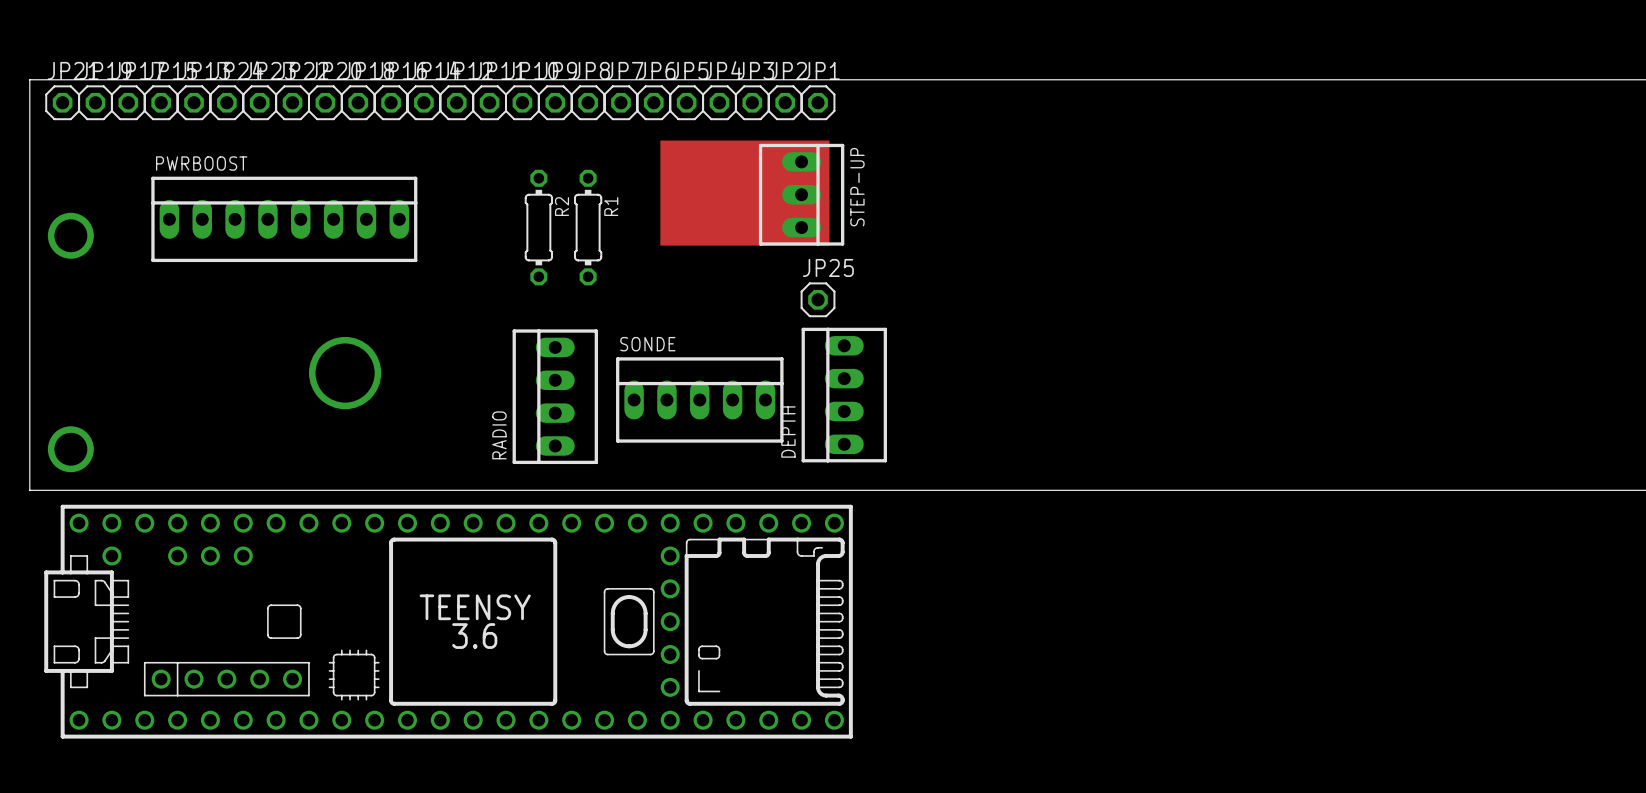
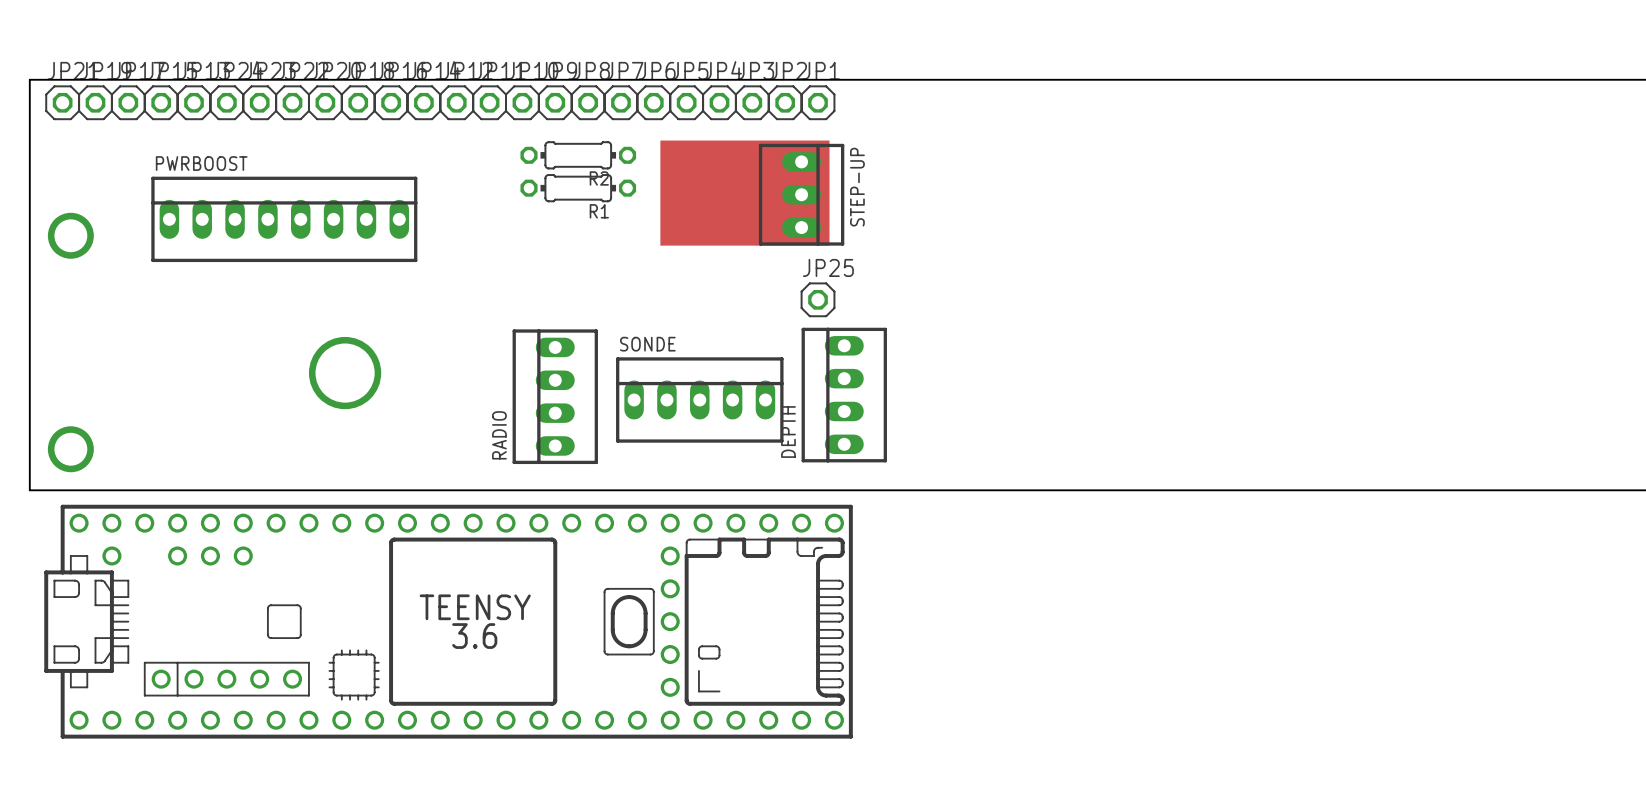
R2 rotation: 0° (538, 227) -> 90° clockwise (578, 155)
R2 position: (538, 227) -> (578, 155)
R1 rotation: 0° (588, 227) -> 90° clockwise (578, 188)

